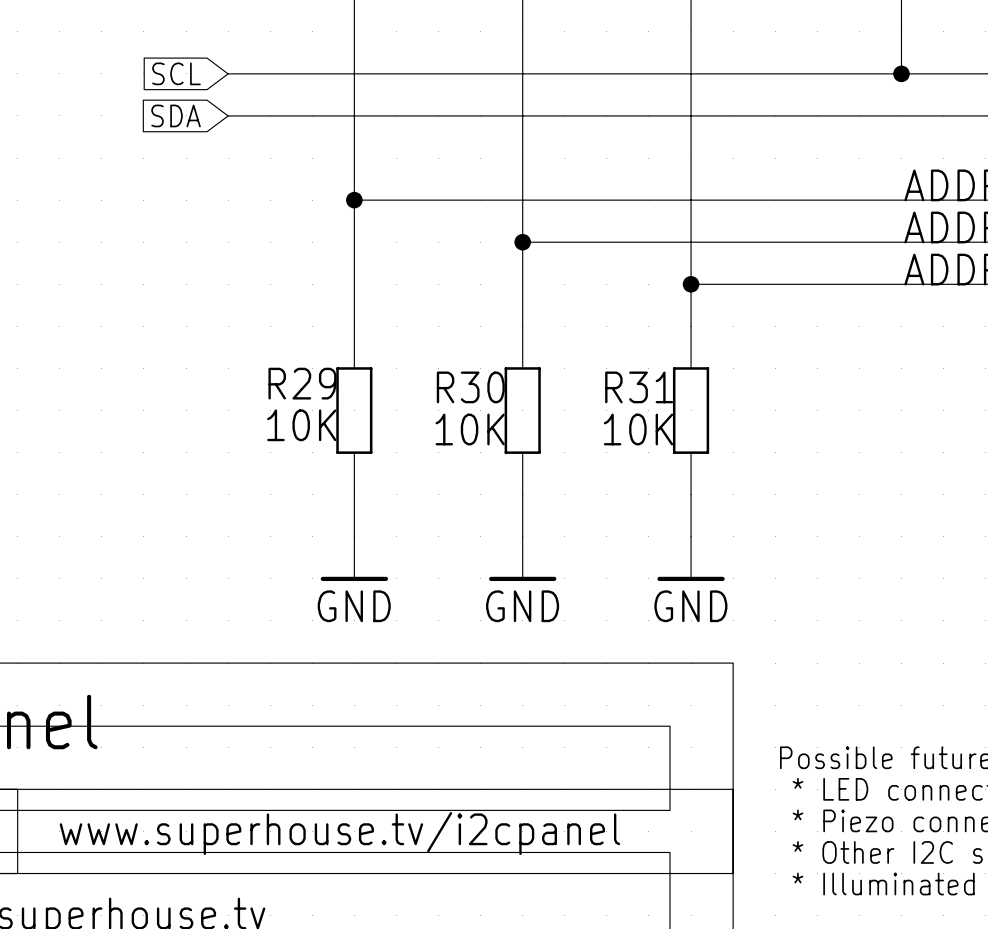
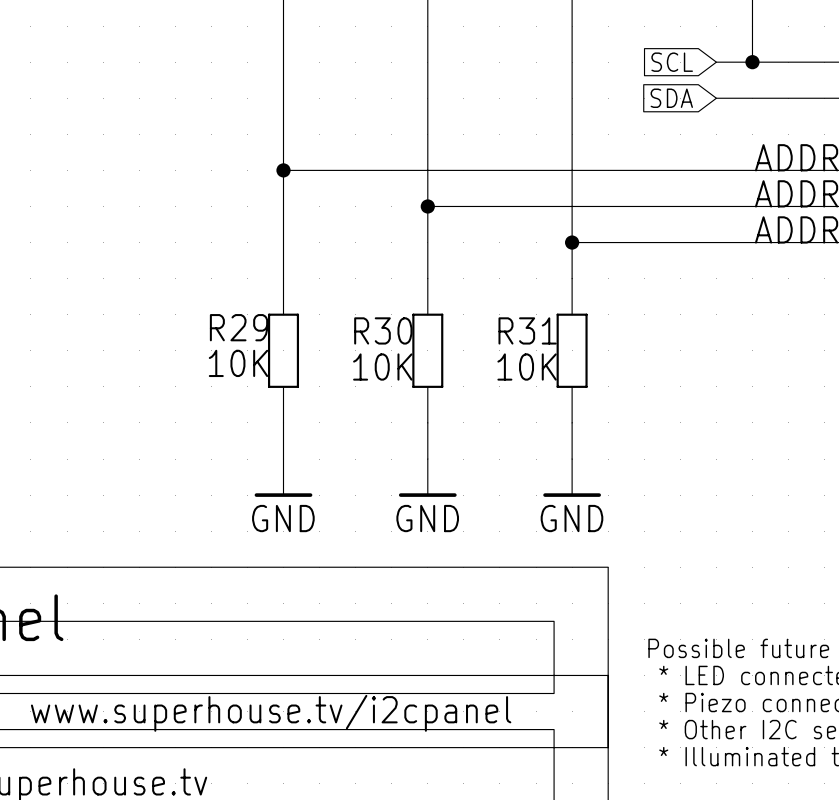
global label: SCL (176, 73) -> none
wire: (228, 73) (859, 73) -> none
global label: none -> SCL (672, 62)
global label: SDA (176, 115) -> none
wire: (228, 115) (859, 115) -> none
global label: none -> SDA (671, 98)

